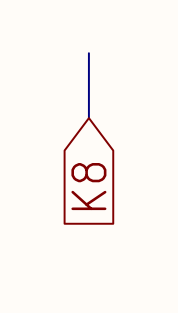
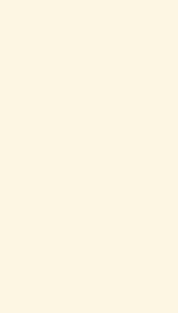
wire: (88, 53) (88, 118) -> none
global label: K8 (88, 186) -> none

